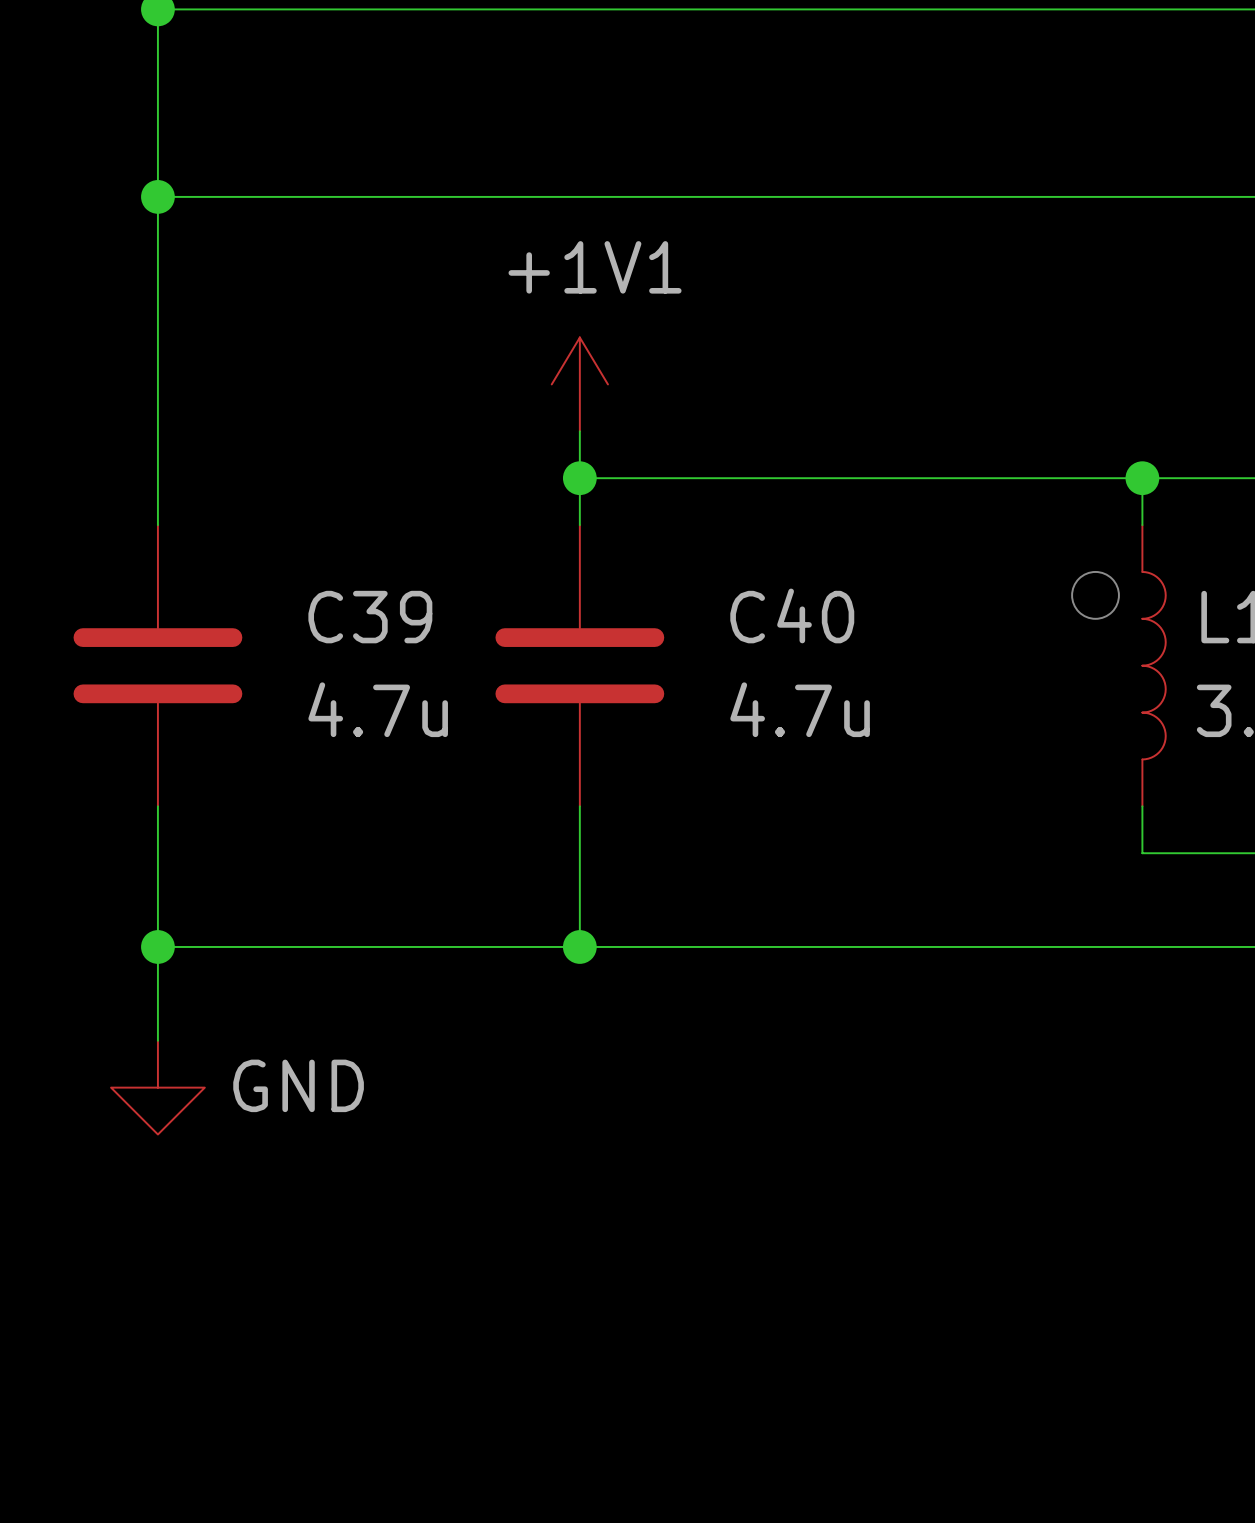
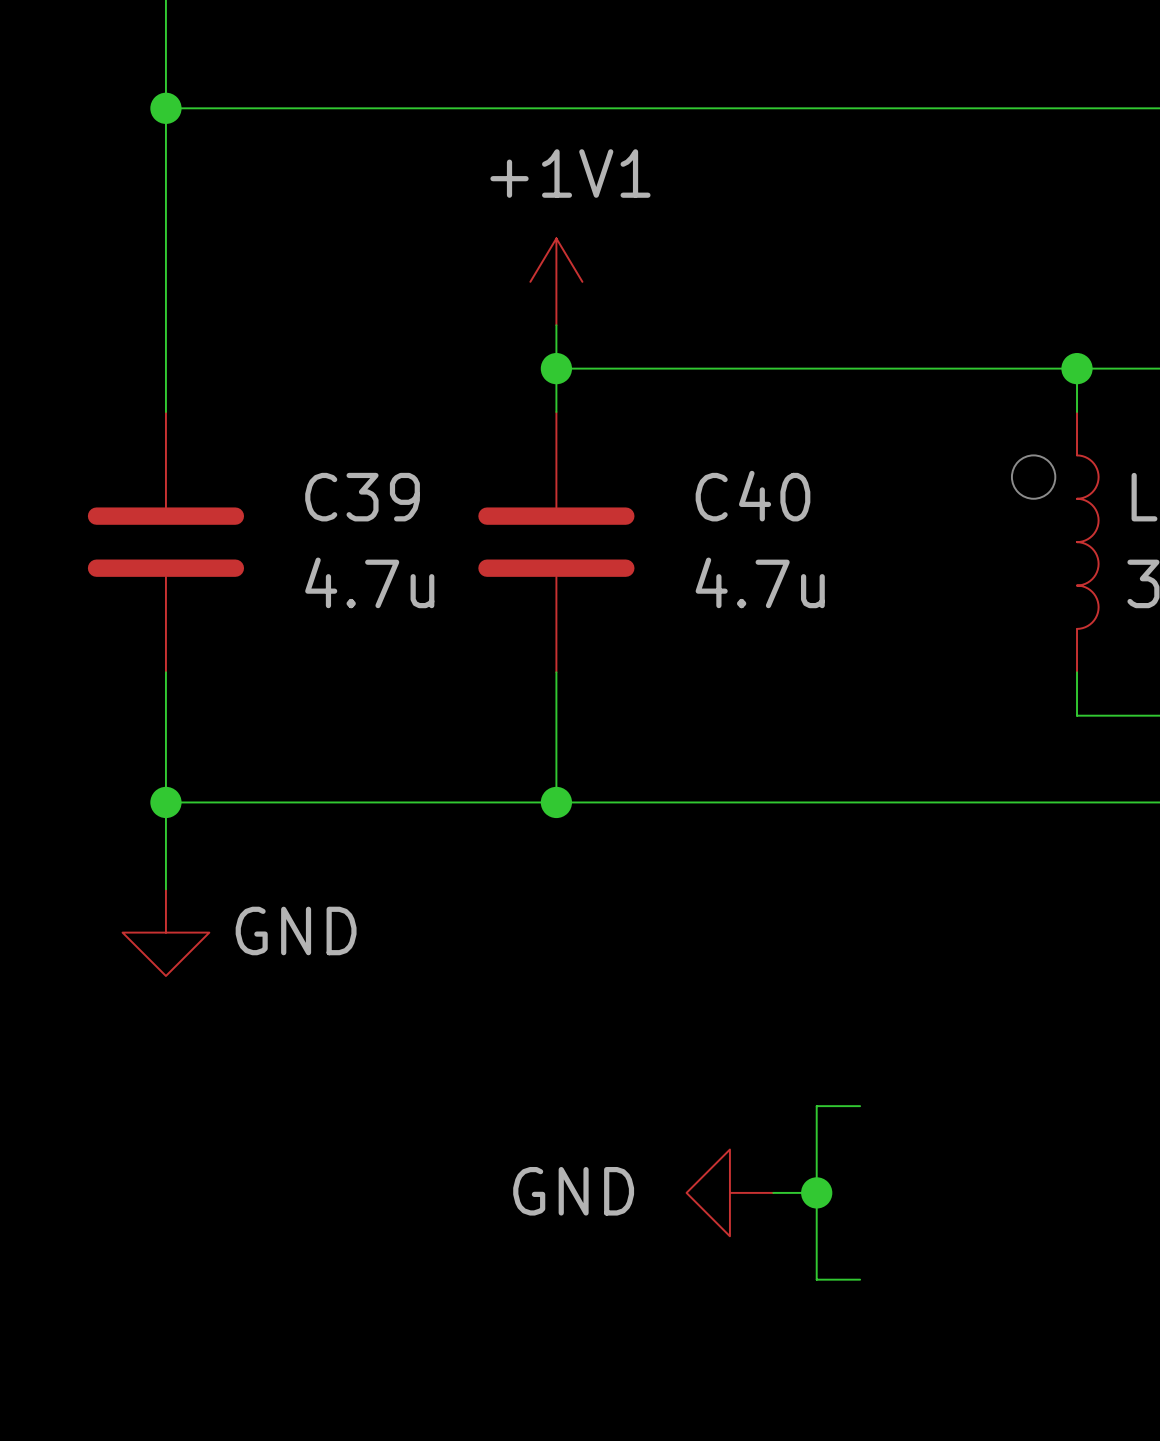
wire: none -> (860, 1106) (816, 1106) (816, 1279) (860, 1279)
power symbol: none -> GND (729, 1192)
wire: none -> (773, 1192) (816, 1192)
junction: none -> (816, 1192)

